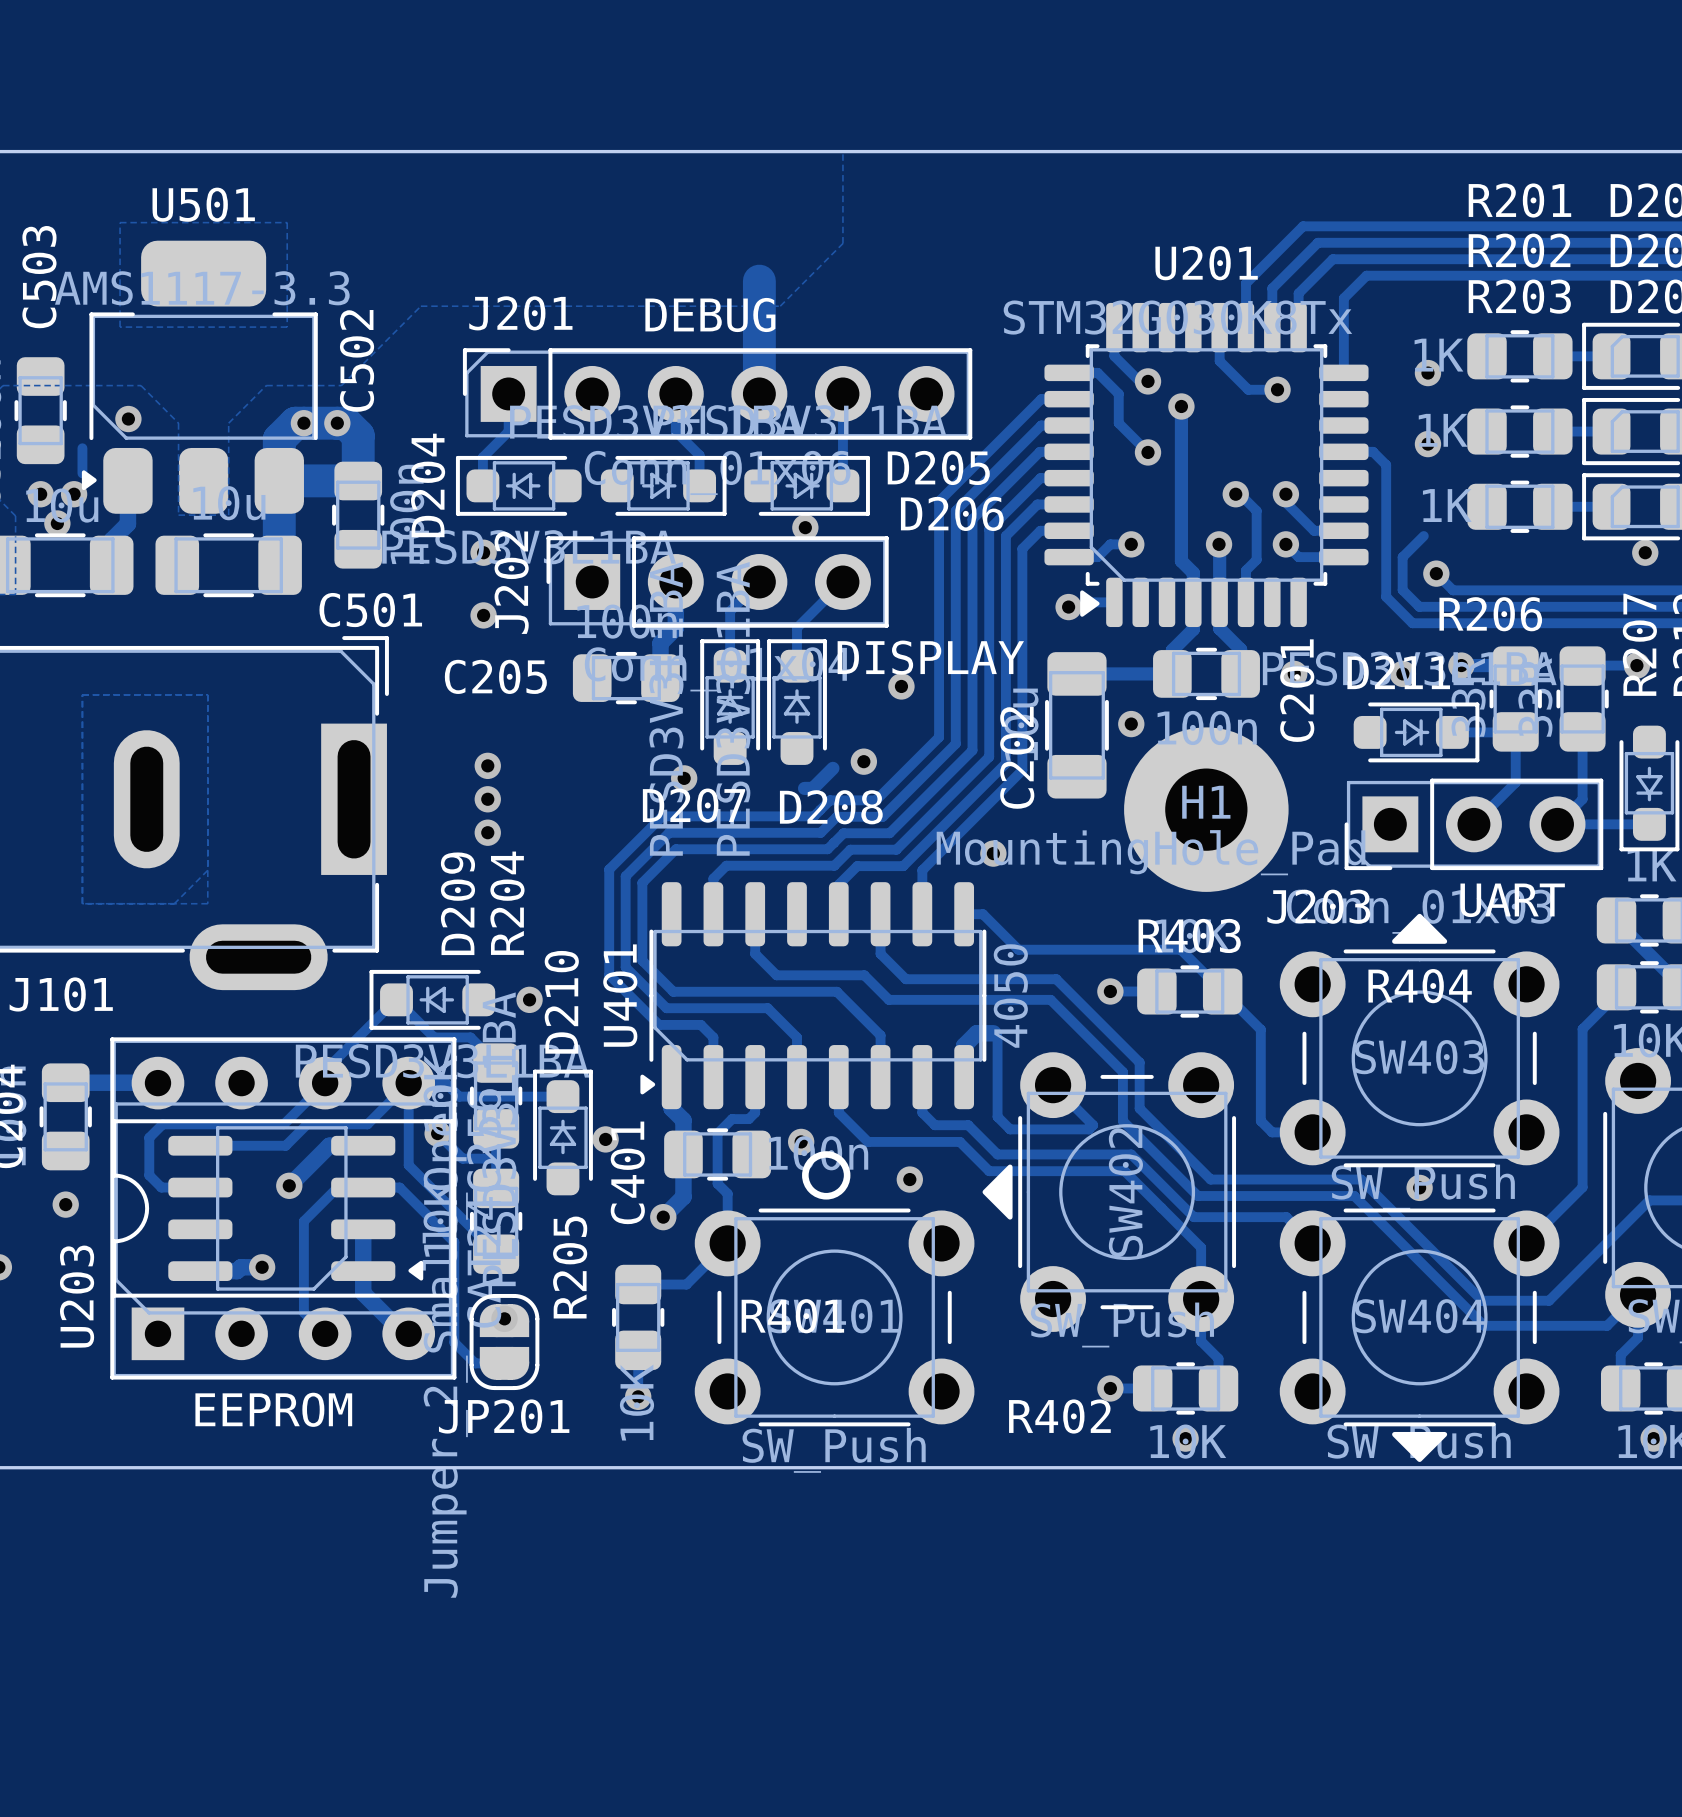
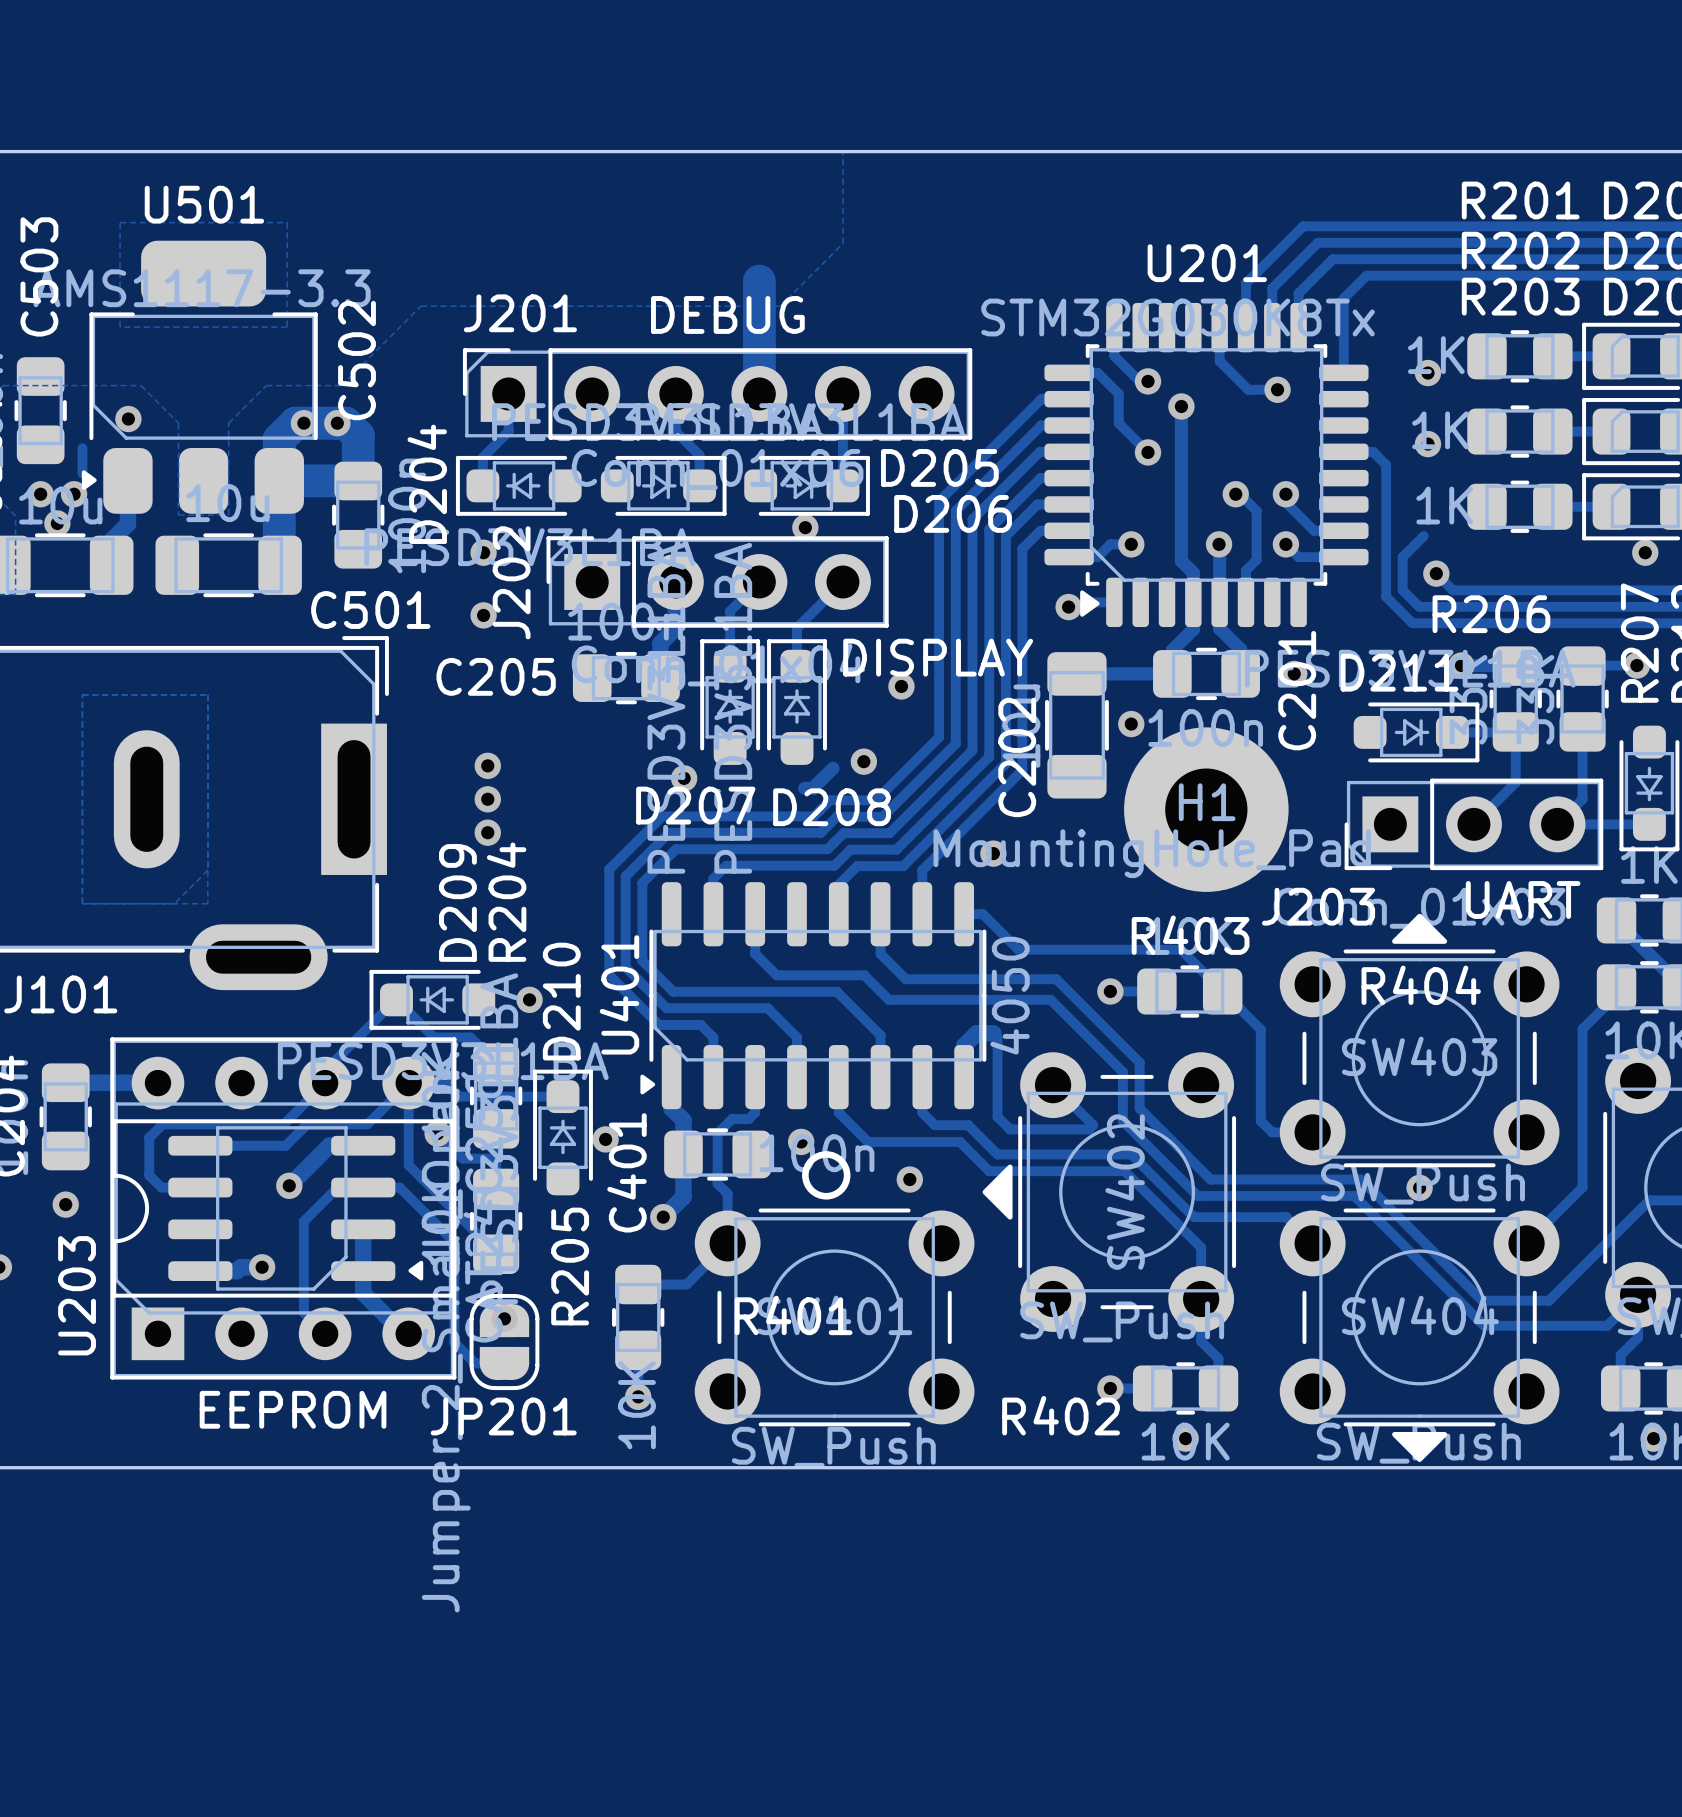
via: (1402, 673) -> none

